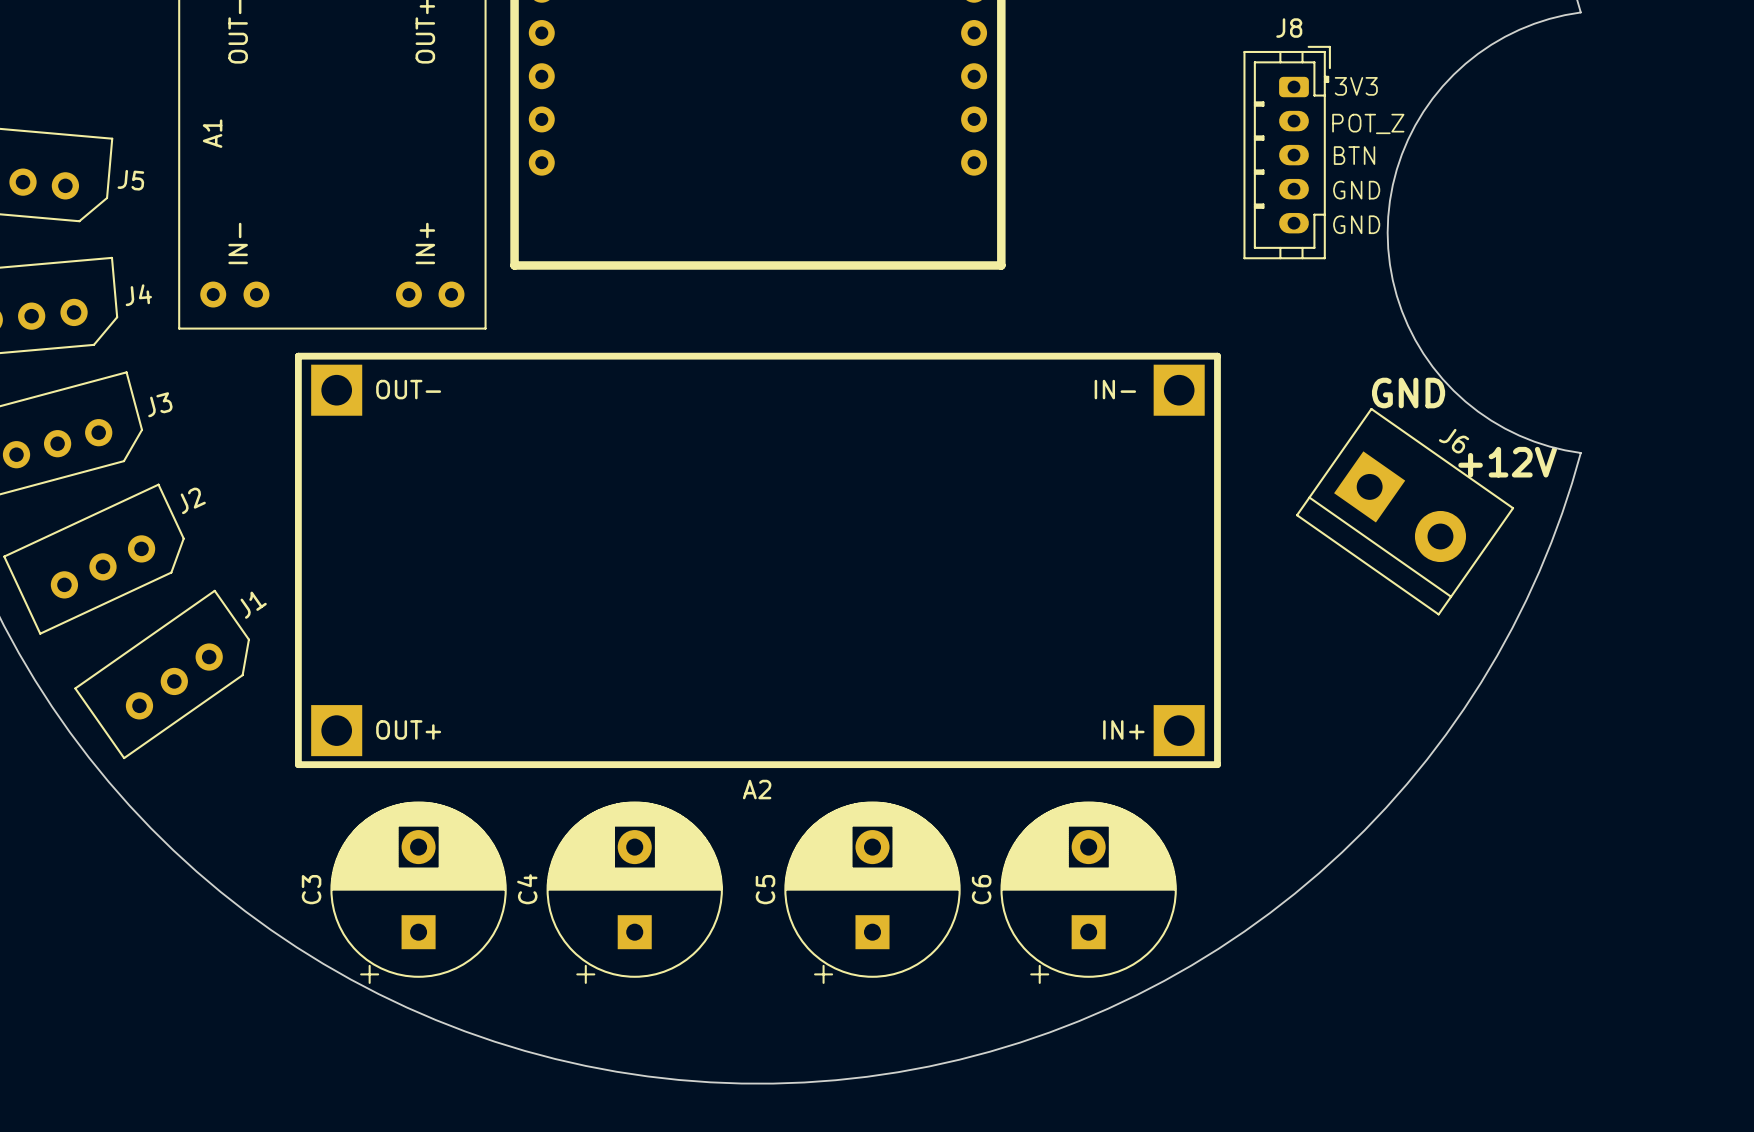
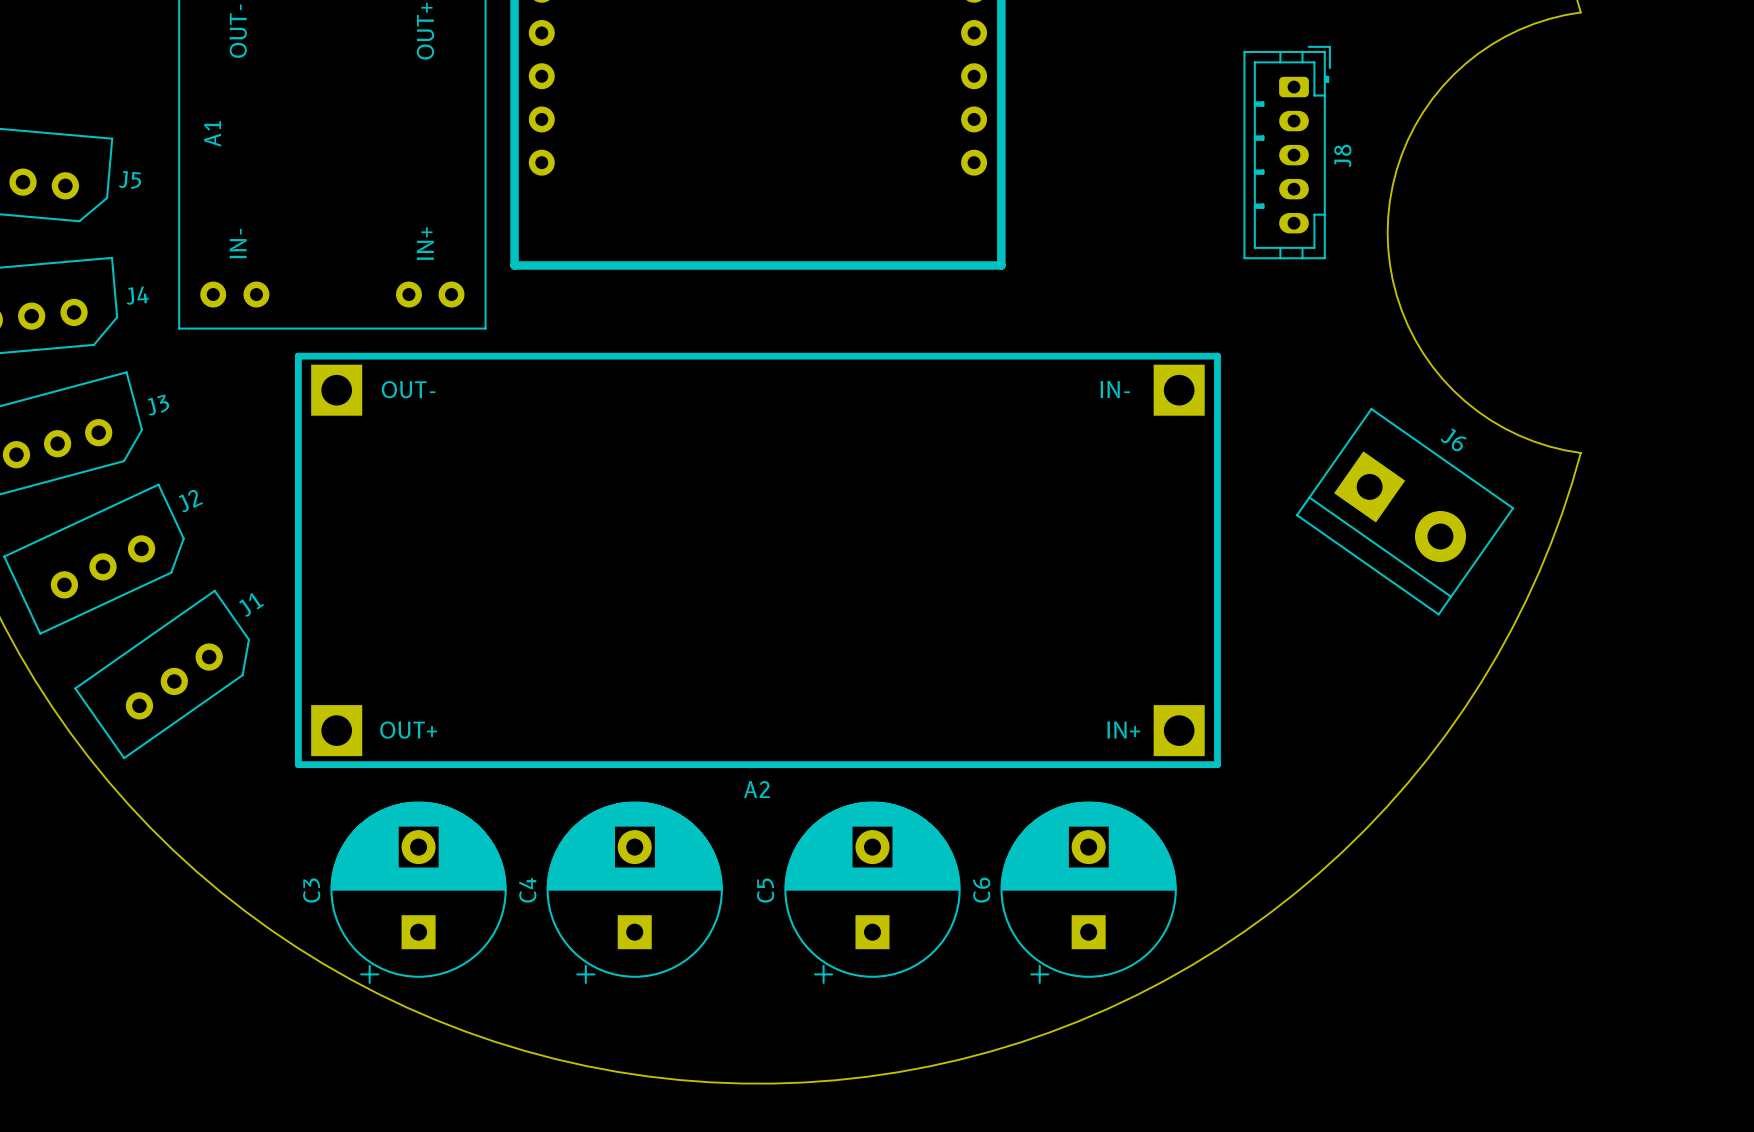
J8 name rotation: 0° (1289, 28) -> 90° counterclockwise (1342, 156)
J8 name position: J8 (1289, 28) -> J8 (1342, 156)
text: 3V3 (1356, 86) -> none
text: POT_Z (1368, 123) -> none
text: BTN (1354, 155) -> none
text: GND (1356, 190) -> none
text: GND (1356, 224) -> none
text: GND (1408, 393) -> none
text: +12V (1507, 462) -> none

